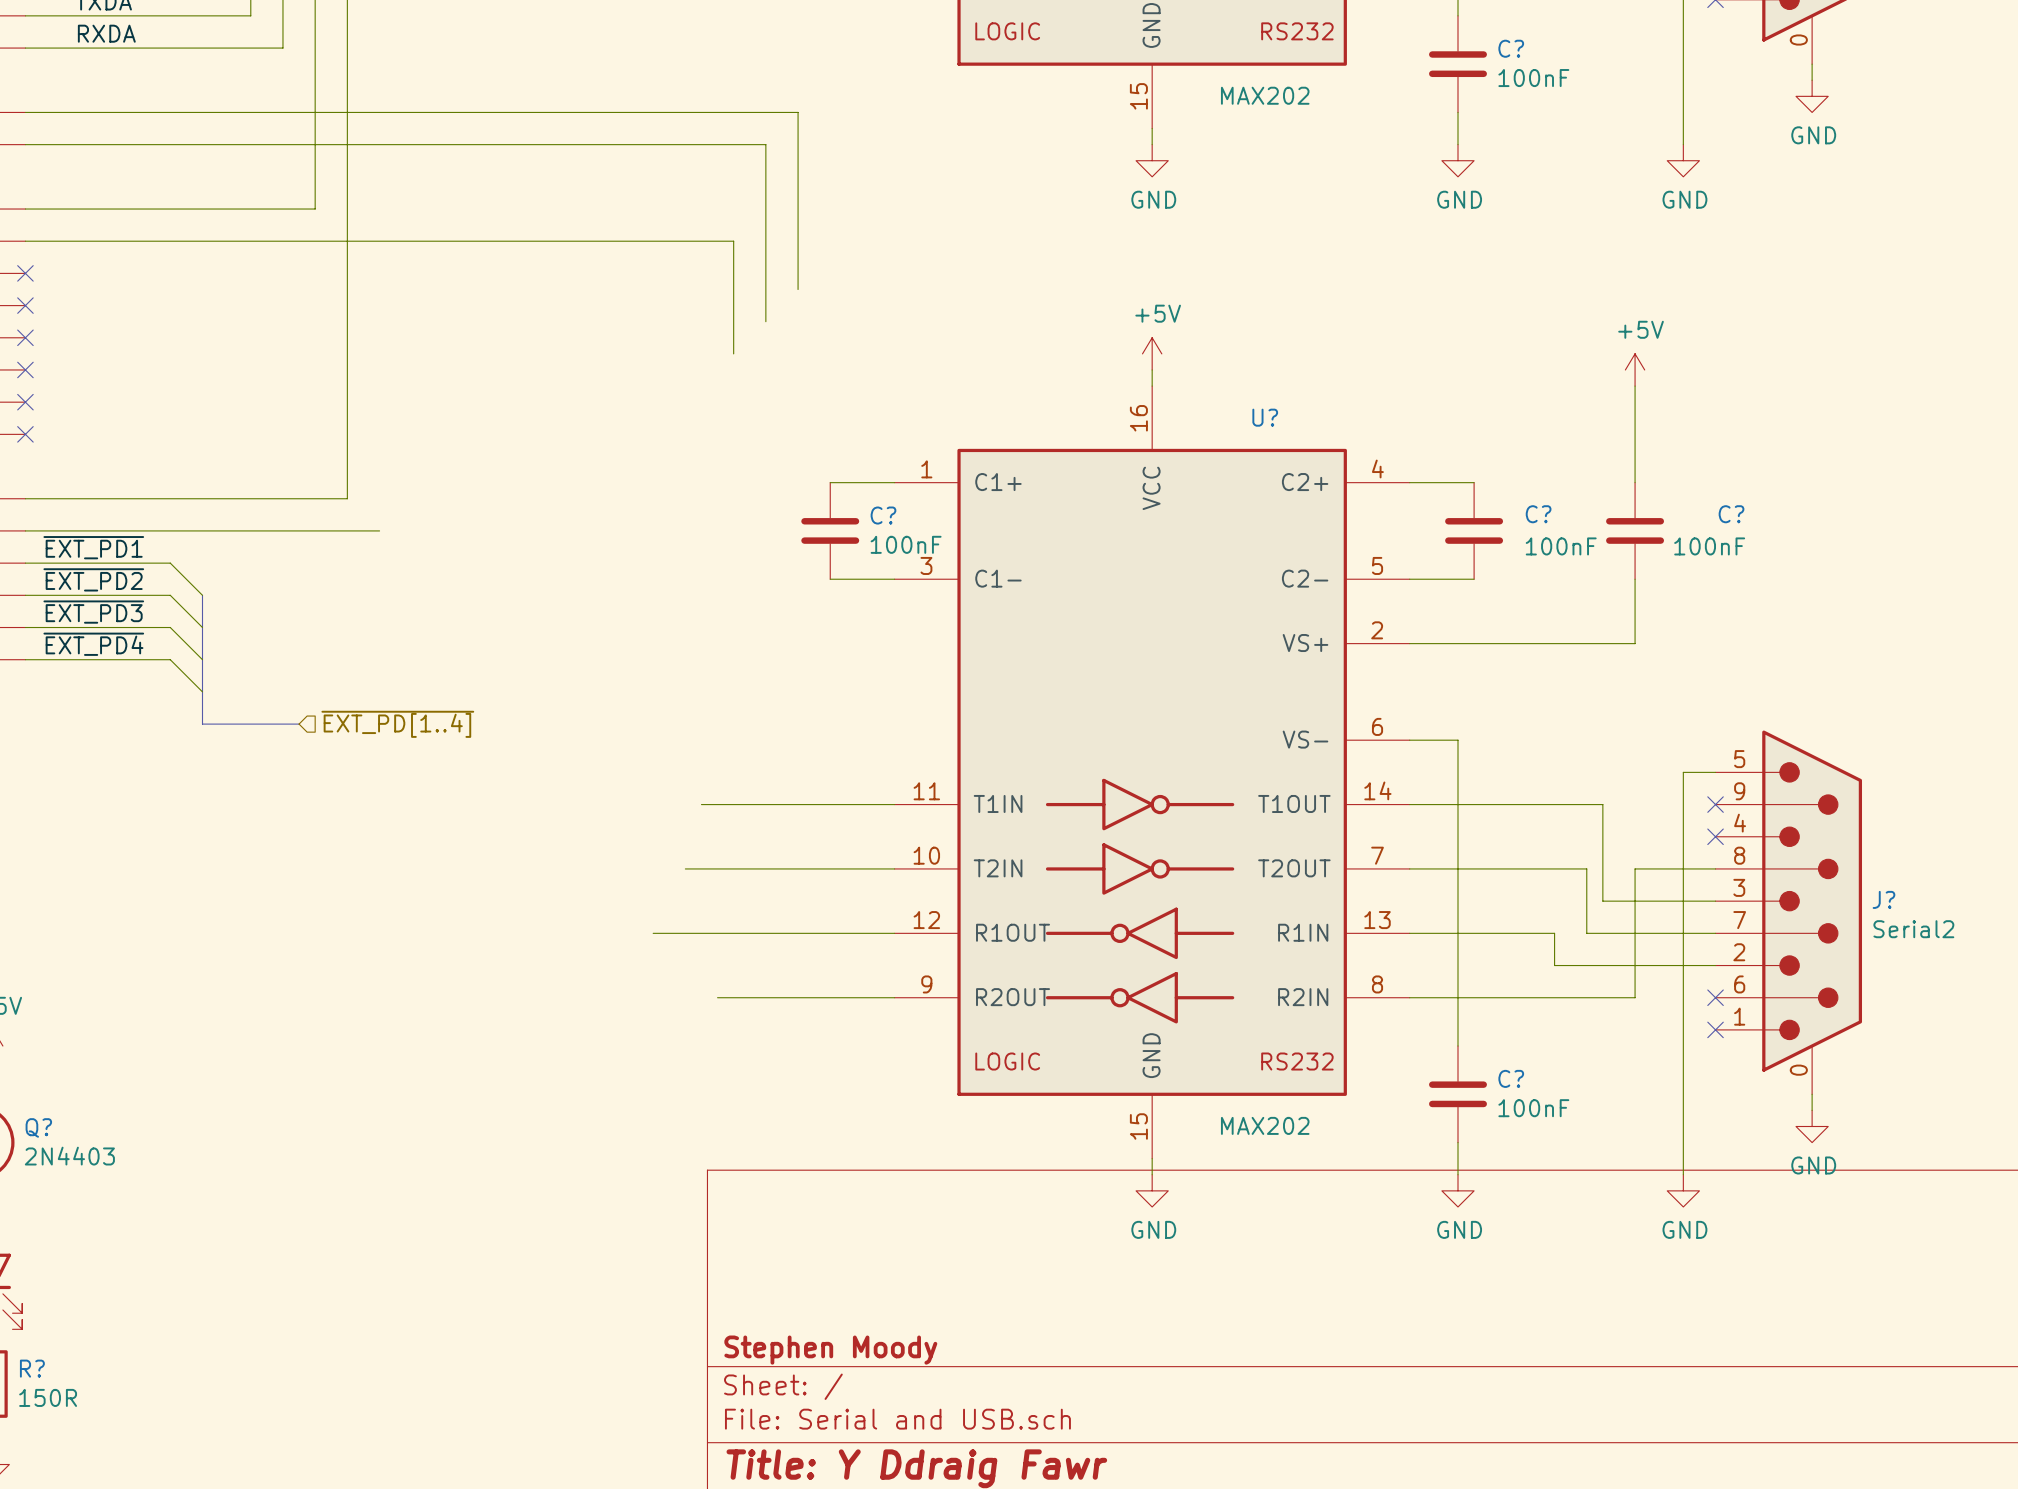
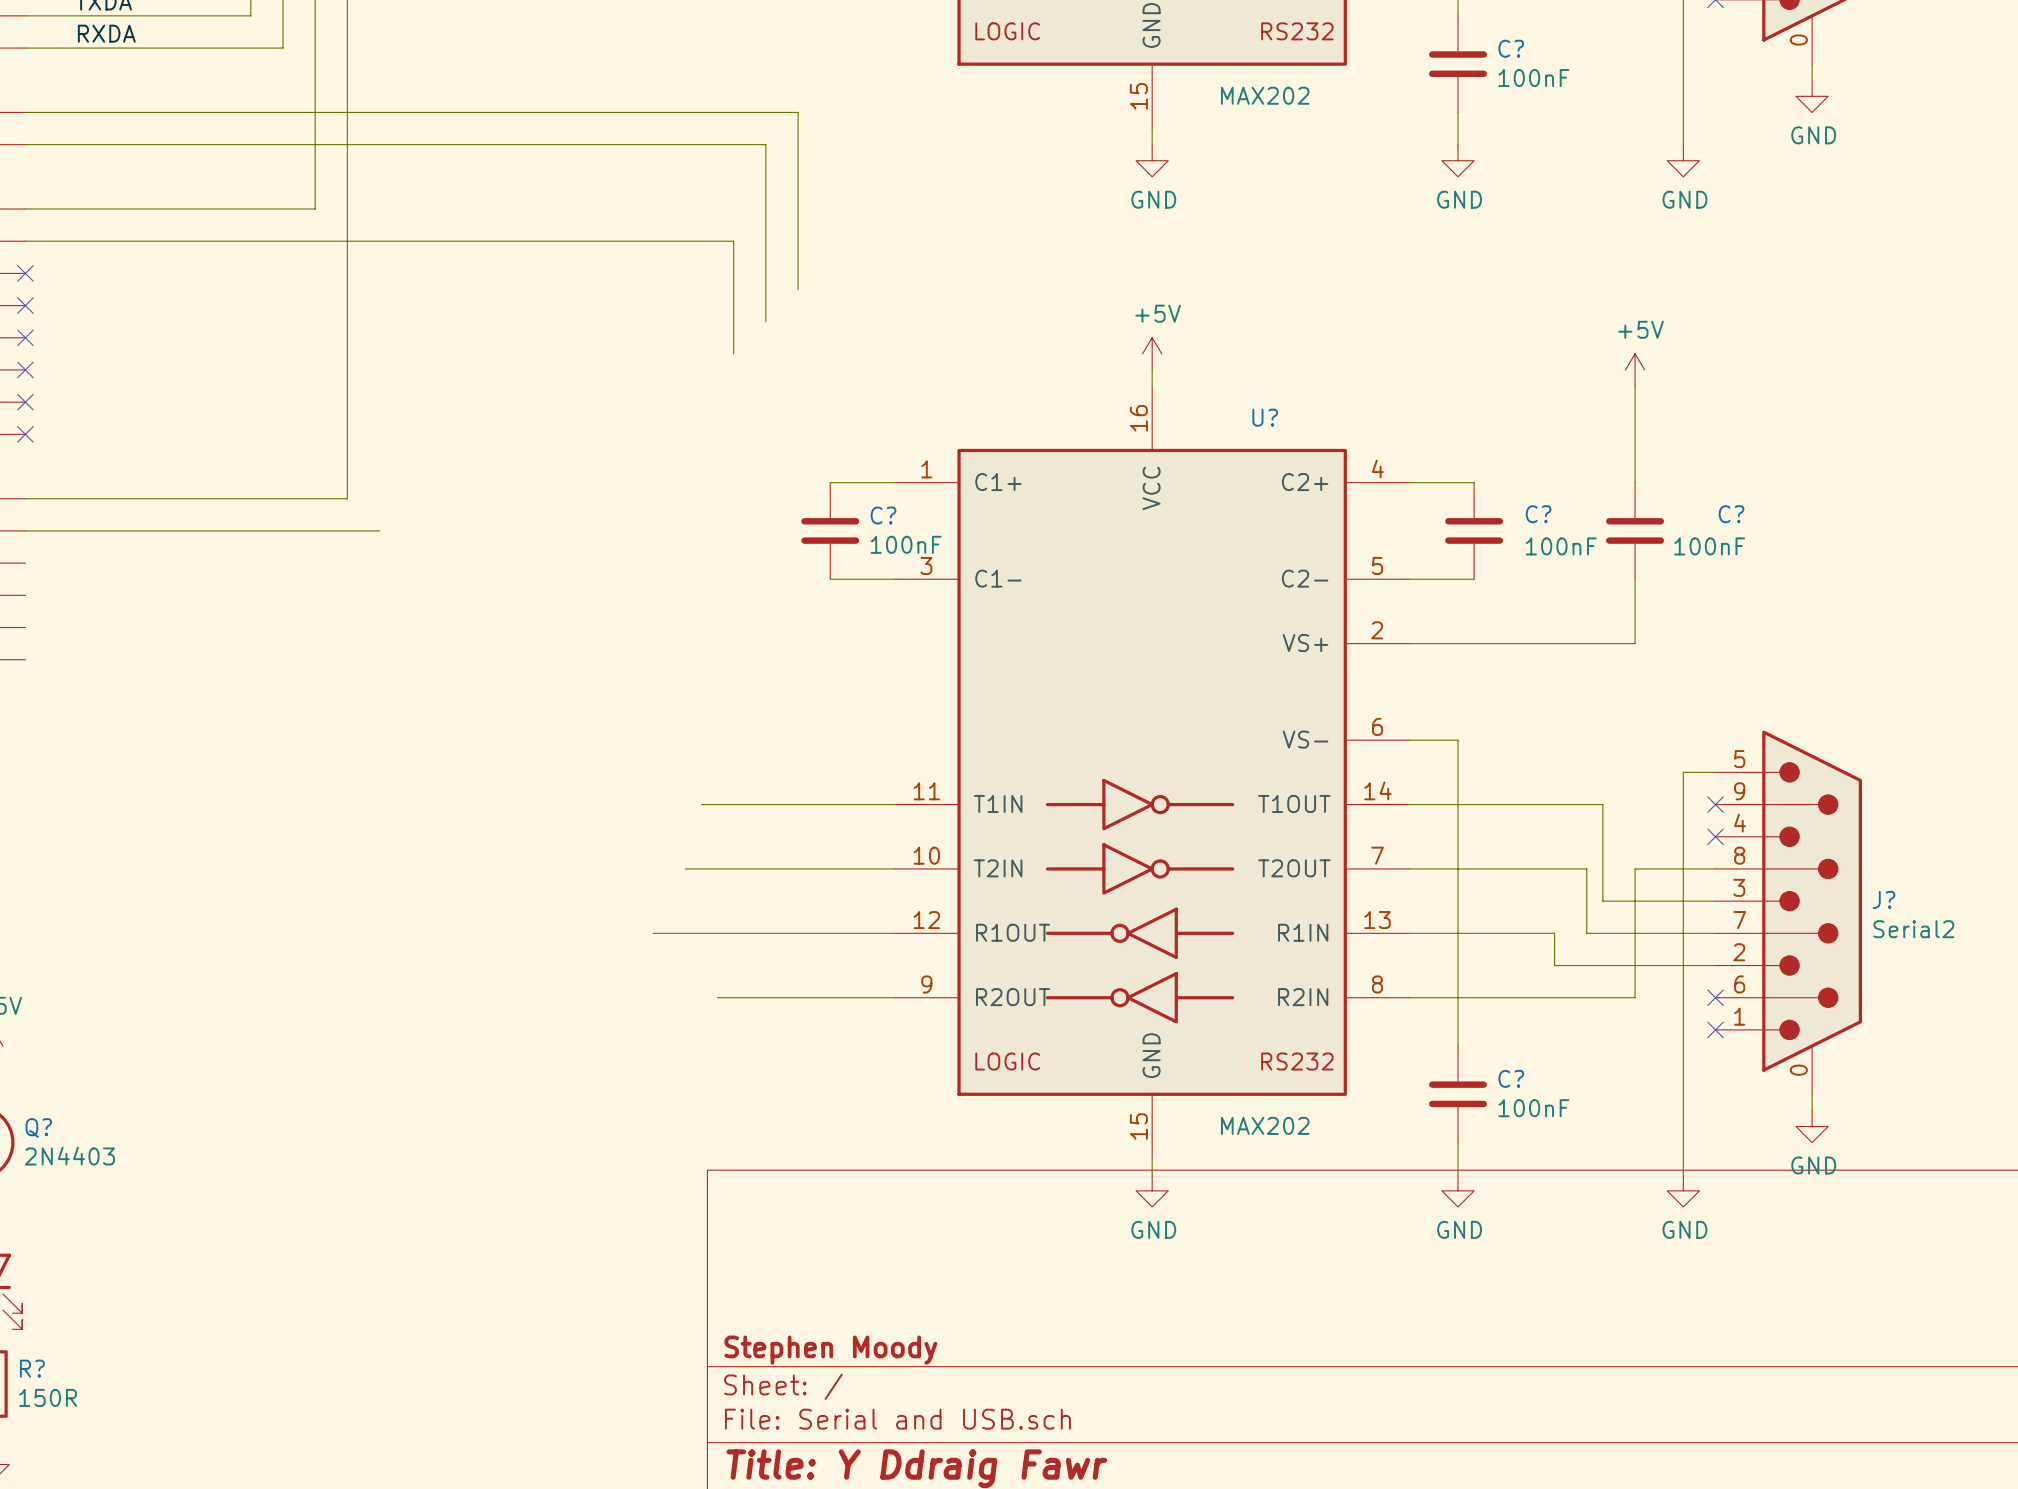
label: ~{EXT_PD1} (93, 547) -> none
wire: (25, 563) (170, 563) (202, 595) -> none
label: ~{EXT_PD2} (93, 579) -> none
wire: (25, 595) (170, 595) (202, 627) -> none
bus: (202, 595) (202, 724) (299, 724) -> none
label: ~{EXT_PD3} (93, 612) -> none
wire: (25, 627) (170, 627) (202, 659) -> none
label: ~{EXT_PD4} (93, 644) -> none
wire: (25, 659) (170, 659) (202, 691) -> none
hierarchical label: ~{EXT_PD[1..4]} (397, 724) -> none

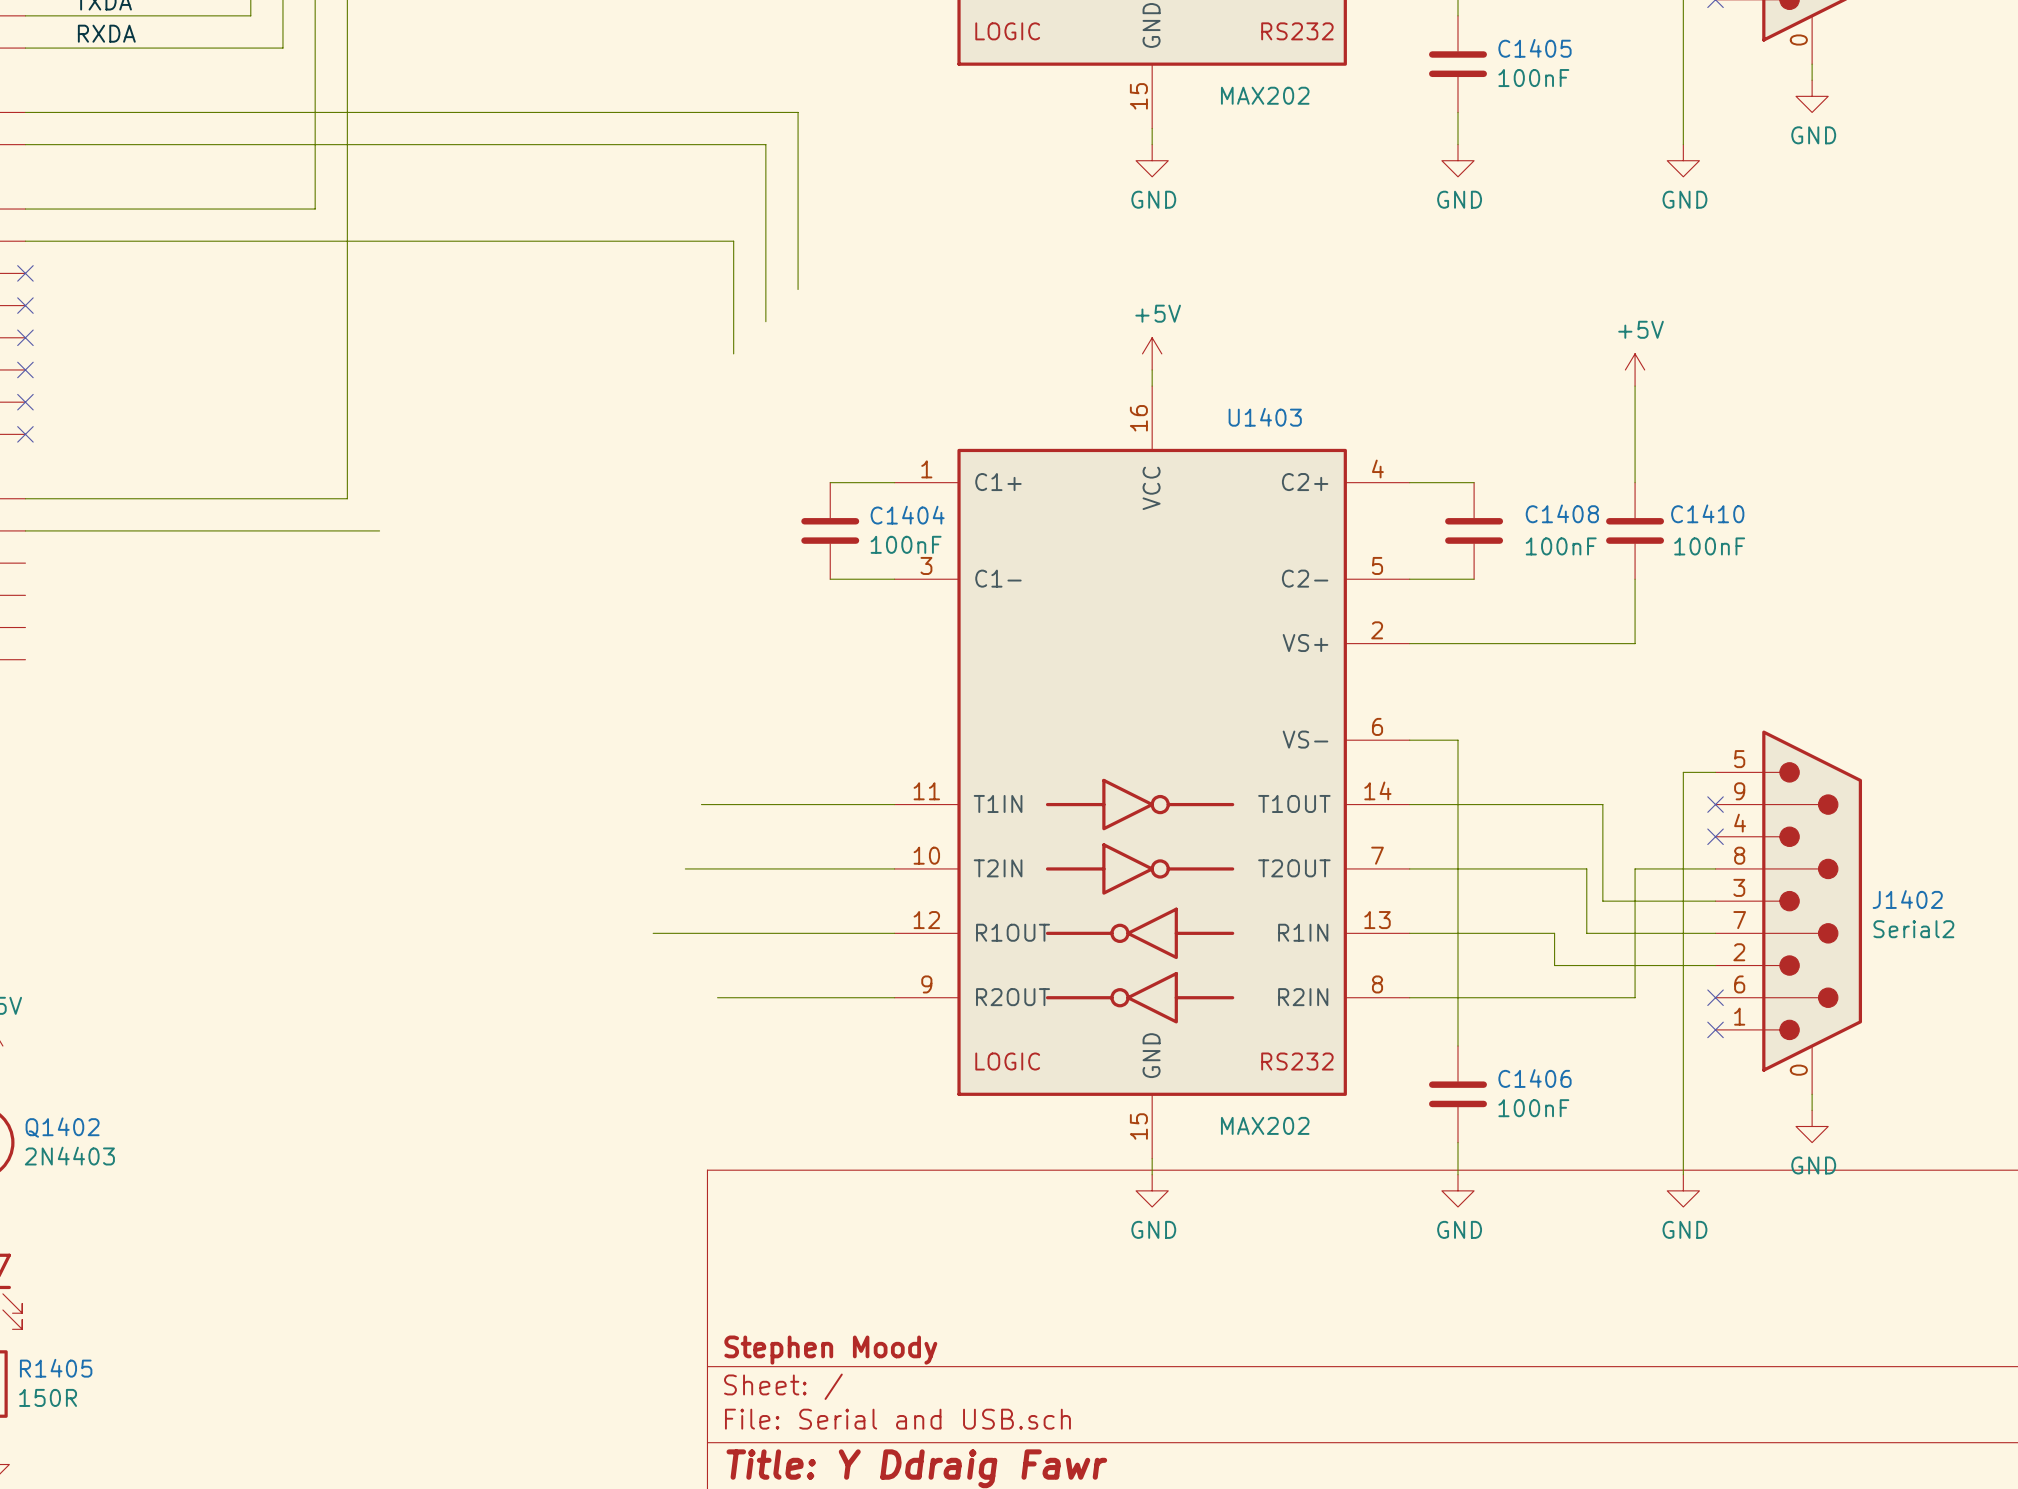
C? name: C? (1511, 48) -> C1405 (1534, 48)
U? name: U? (1265, 417) -> U1403 (1265, 417)
C? name: C? (1538, 514) -> C1408 (1562, 513)
C? name: C? (1731, 514) -> C1410 (1707, 513)
C? name: C? (883, 515) -> C1404 (907, 515)
J? name: J? (1883, 899) -> J1402 (1907, 899)
C? name: C? (1511, 1078) -> C1406 (1534, 1078)
Q? name: Q? (38, 1127) -> Q1402 (62, 1127)
R? name: R? (32, 1368) -> R1405 (56, 1368)

